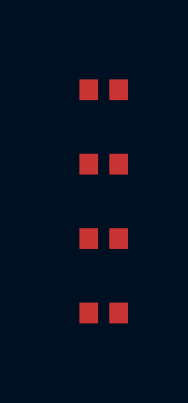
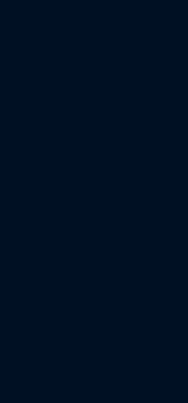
part: (103, 89) -> none
part: (103, 164) -> none
part: (103, 238) -> none
part: (103, 312) -> none

